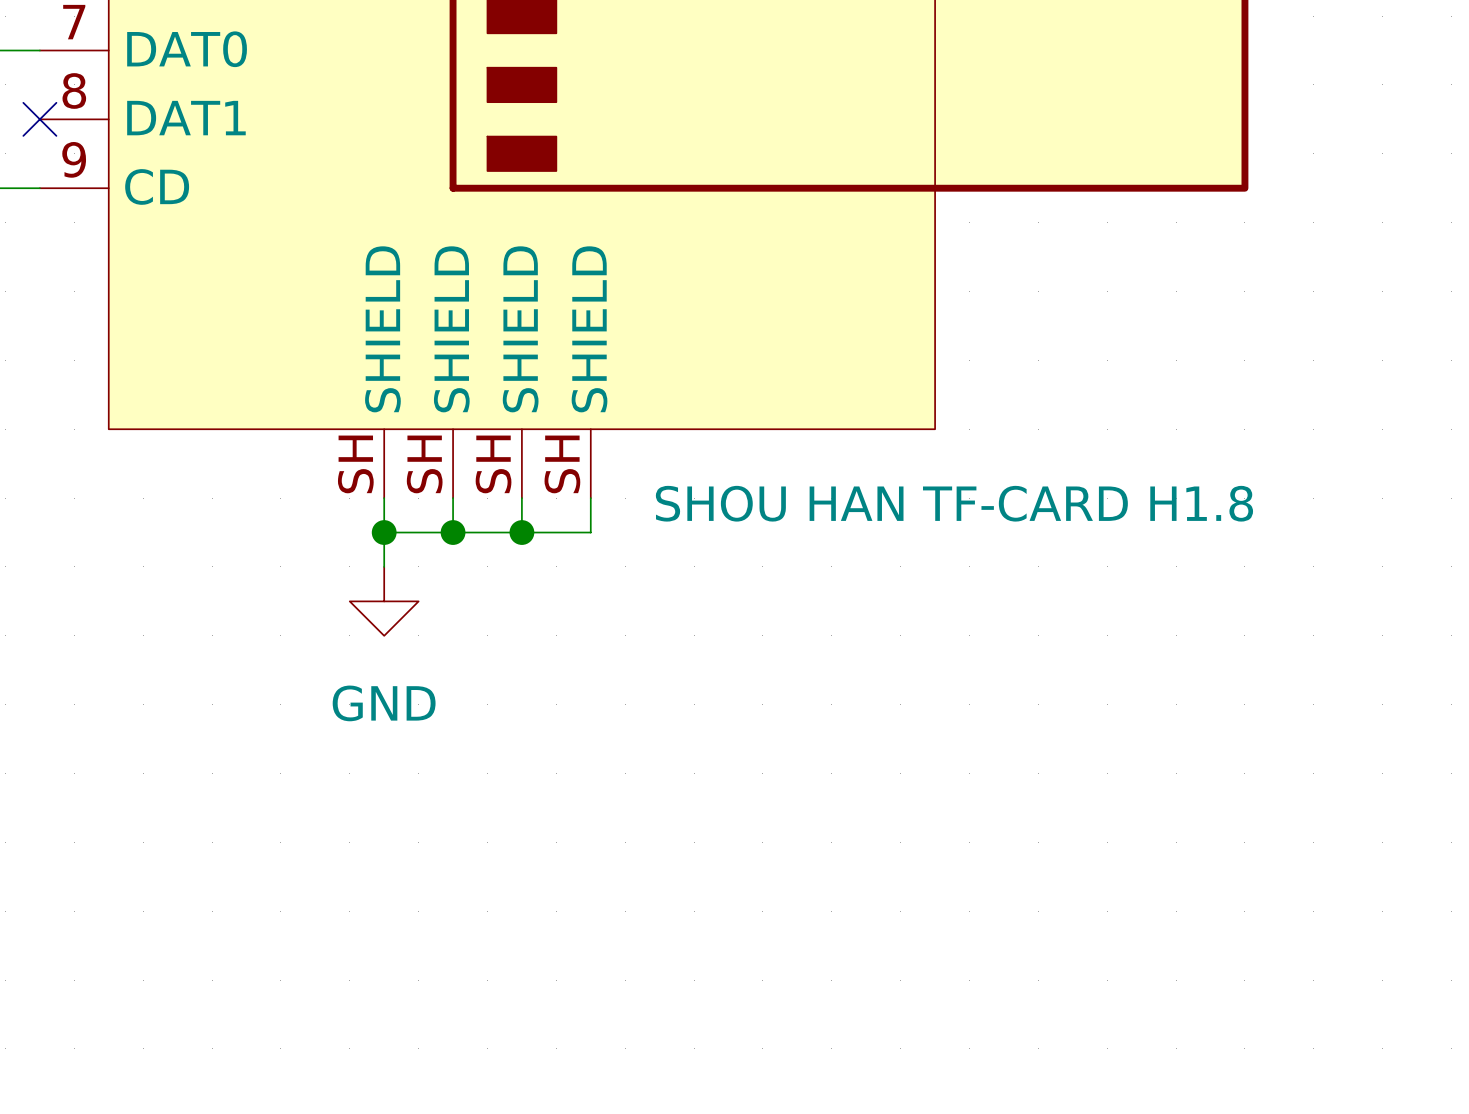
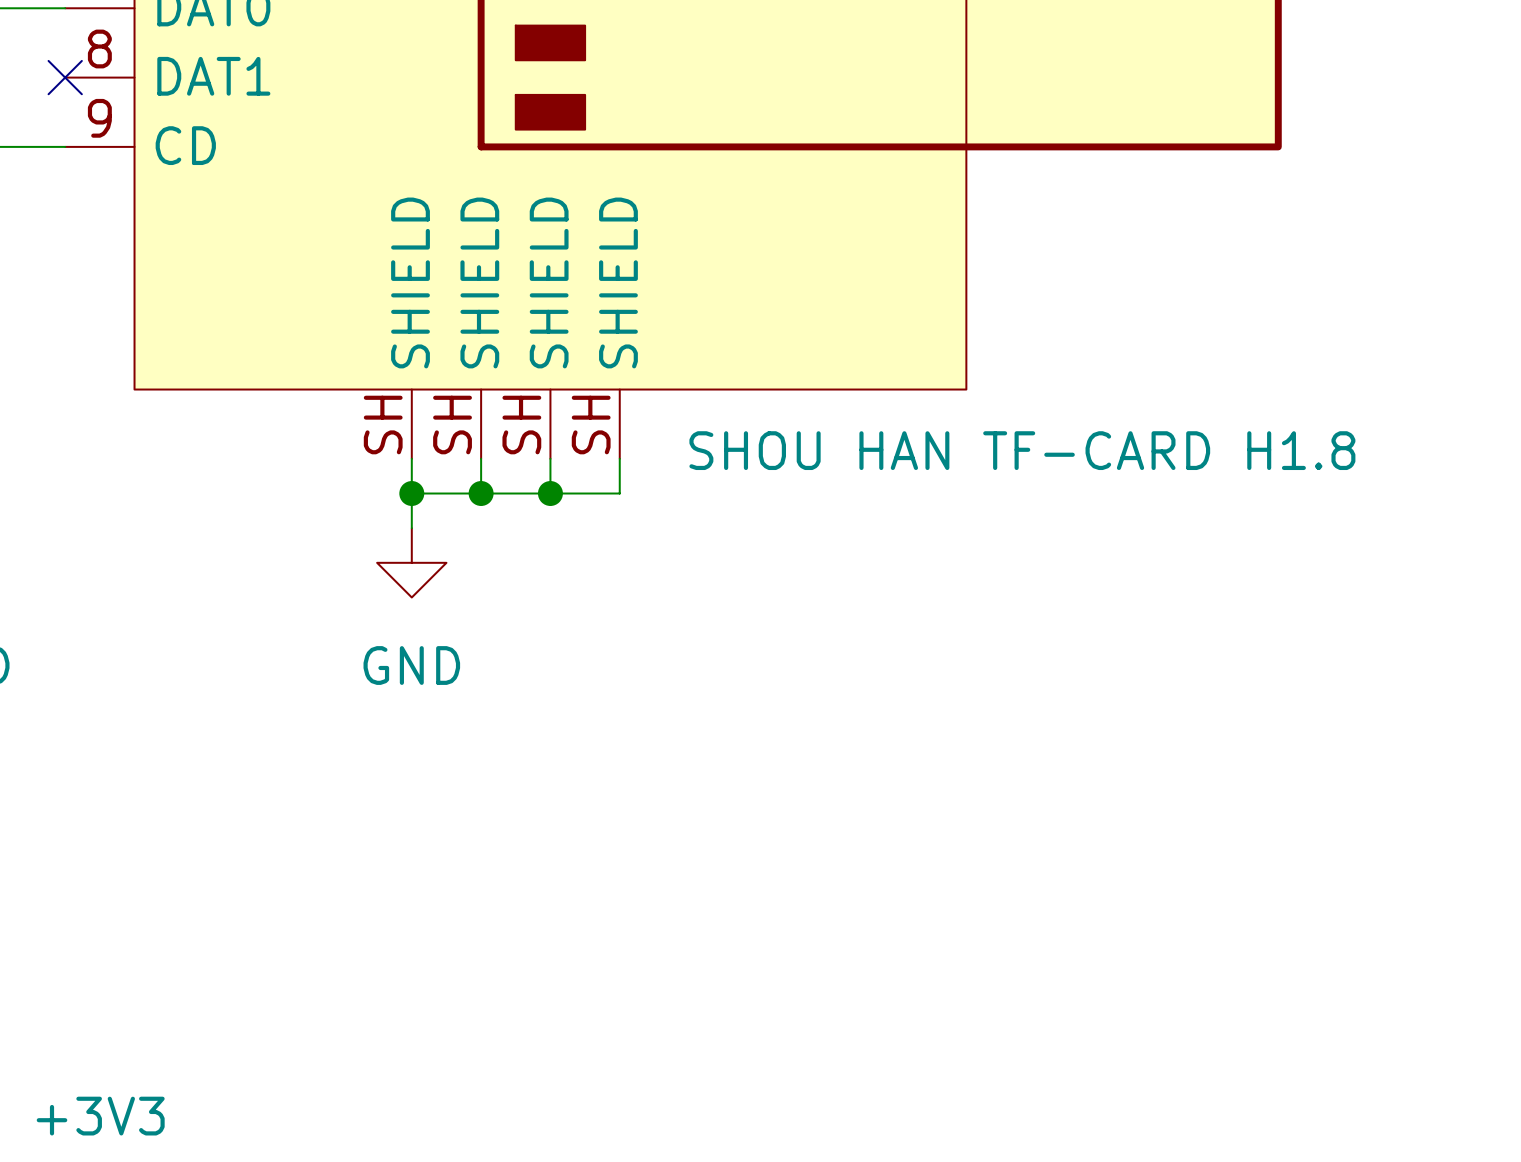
part value position: SHOU HAN TF-CARD H1.8 (954, 503) -> SHOU HAN TF-CARD H1.8 (1022, 450)

